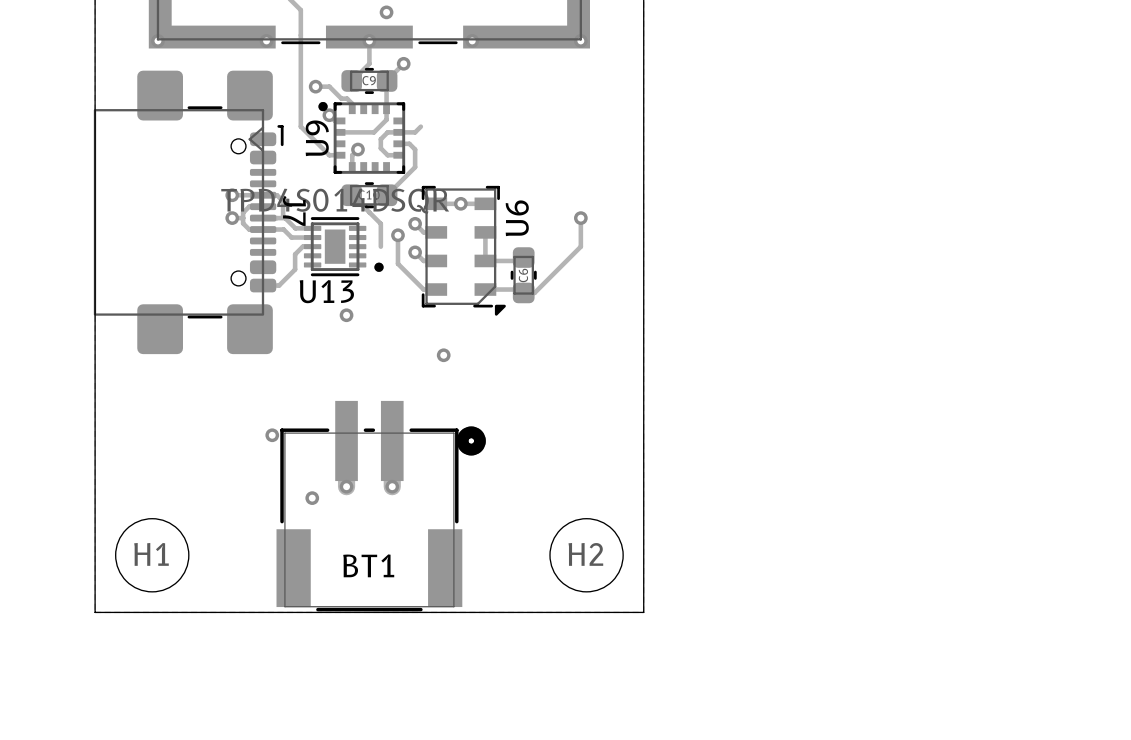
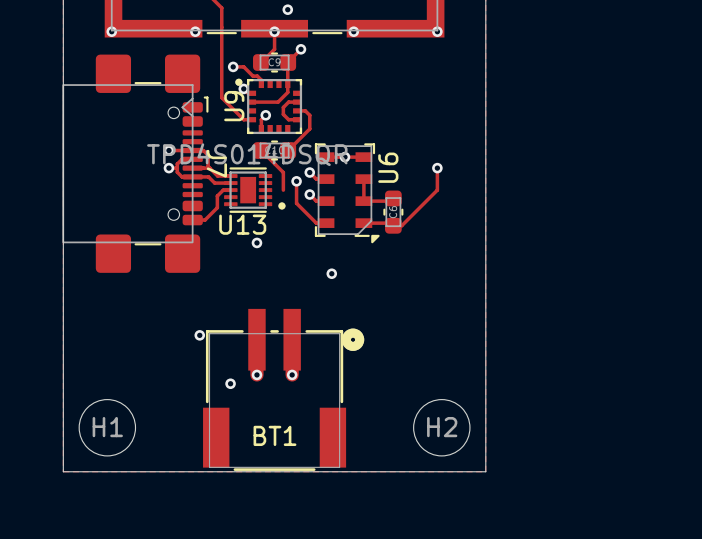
track: (420, 126) (415, 132) (398, 132) -> none

